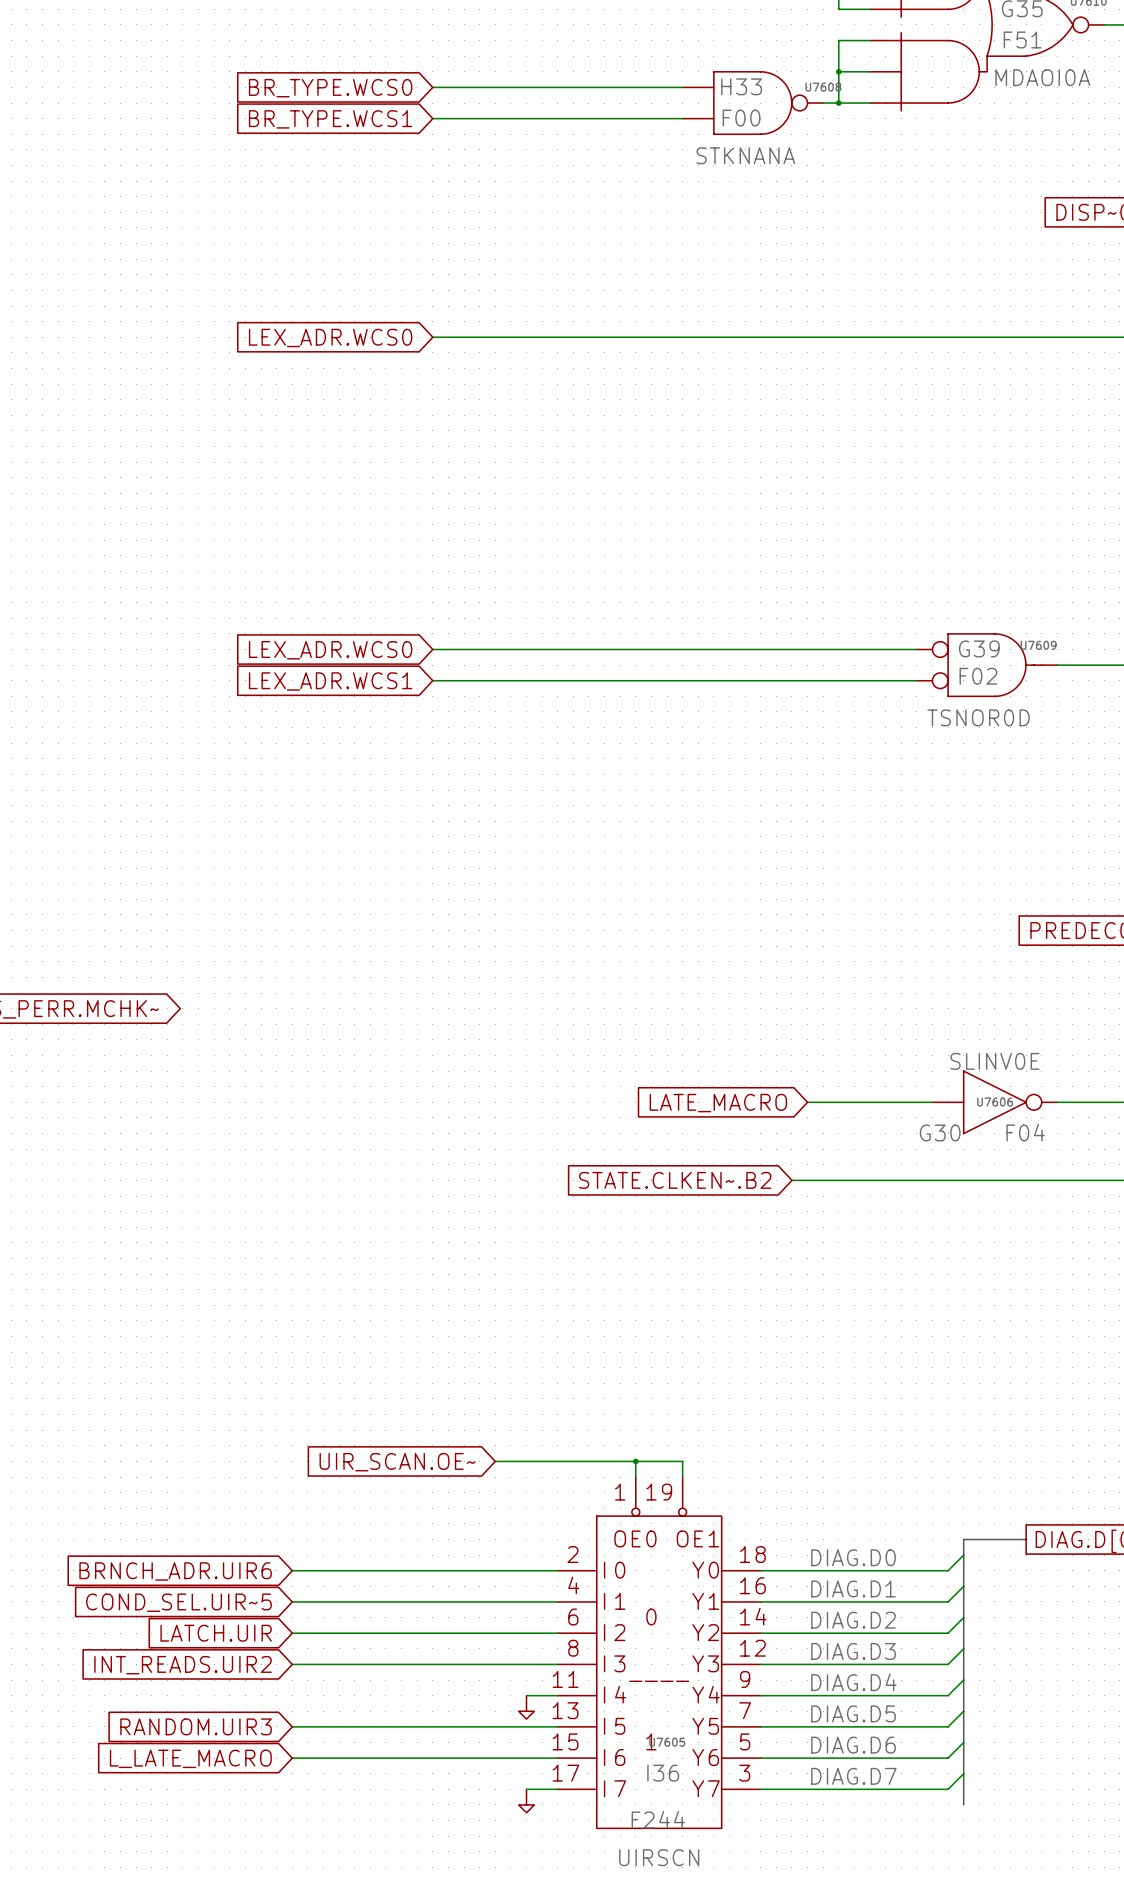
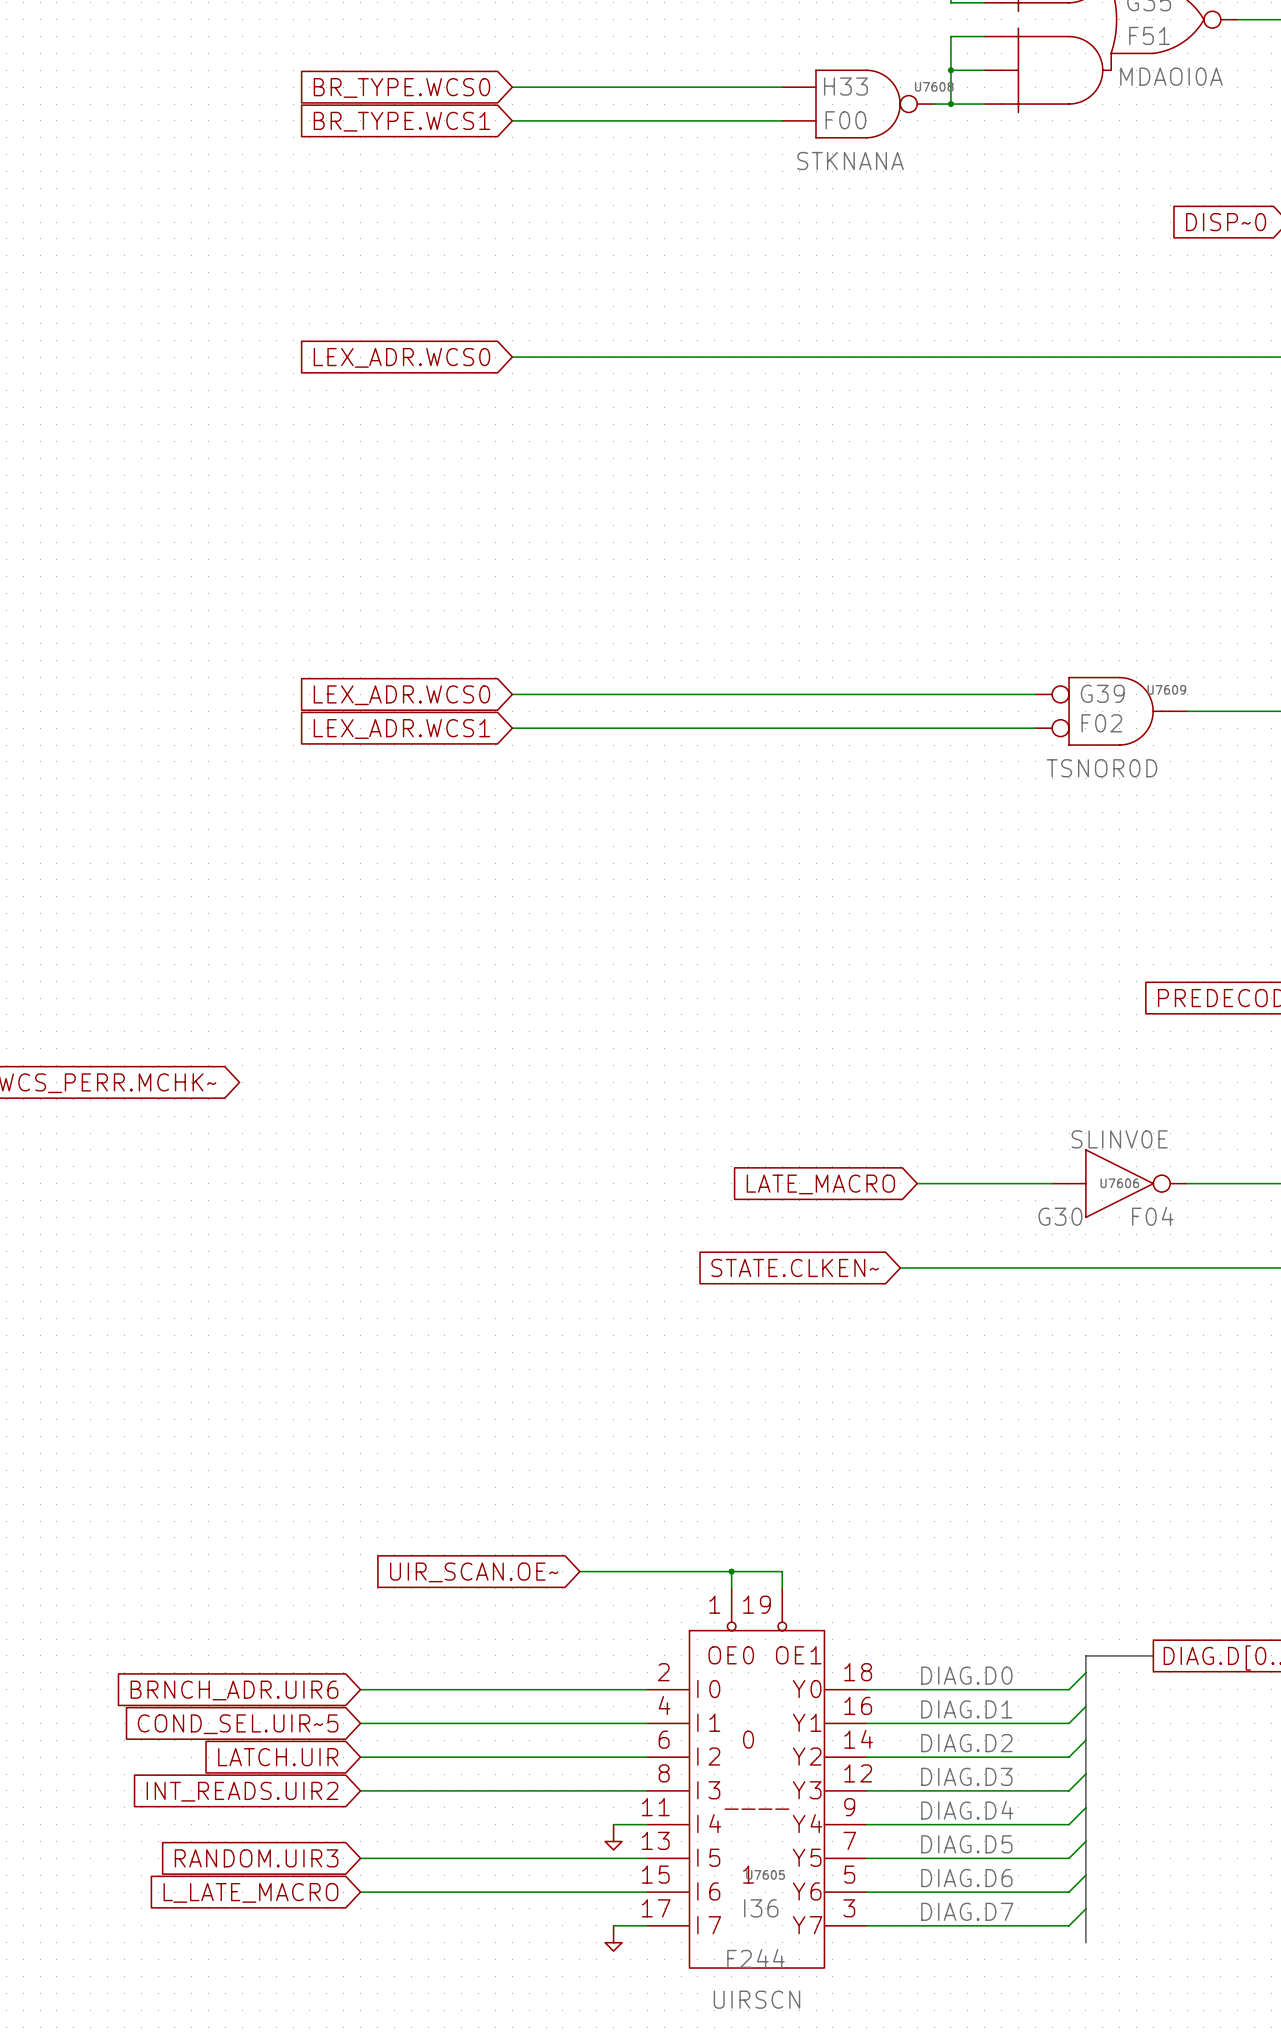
global label: STATE.CLKEN~.B2 (675, 1180) -> STATE.CLKEN~ (795, 1267)

